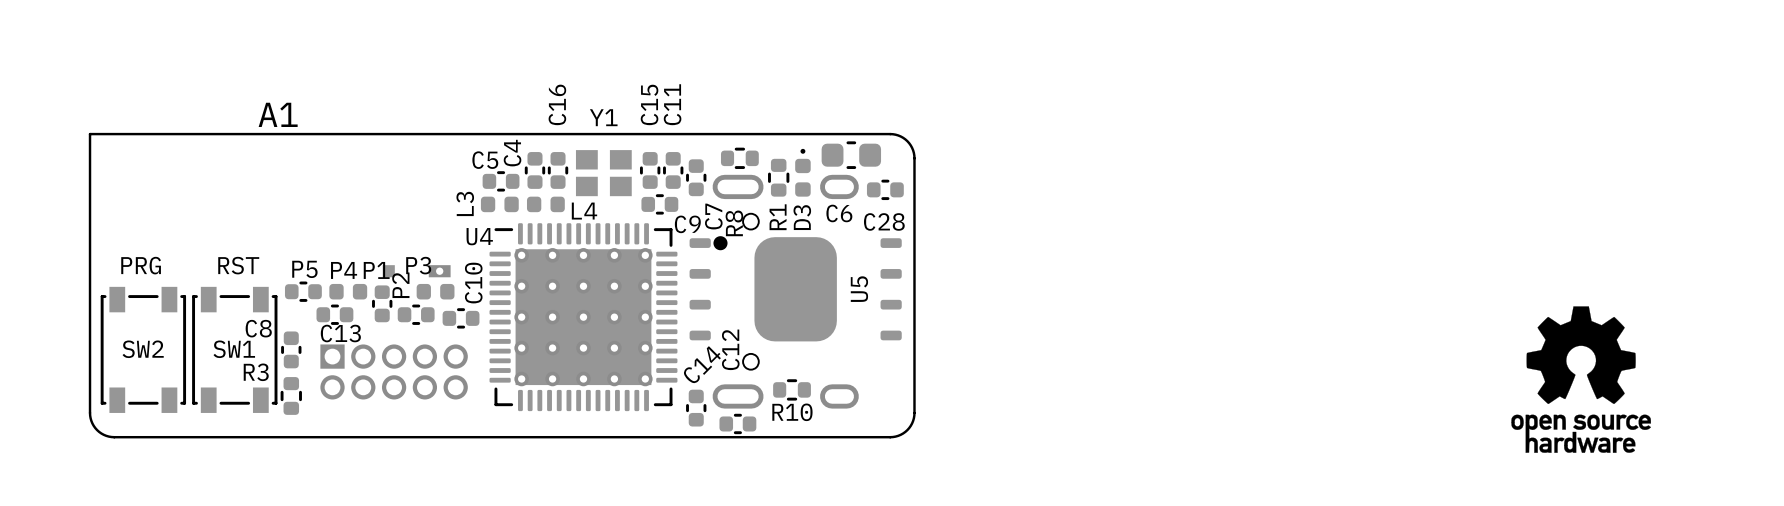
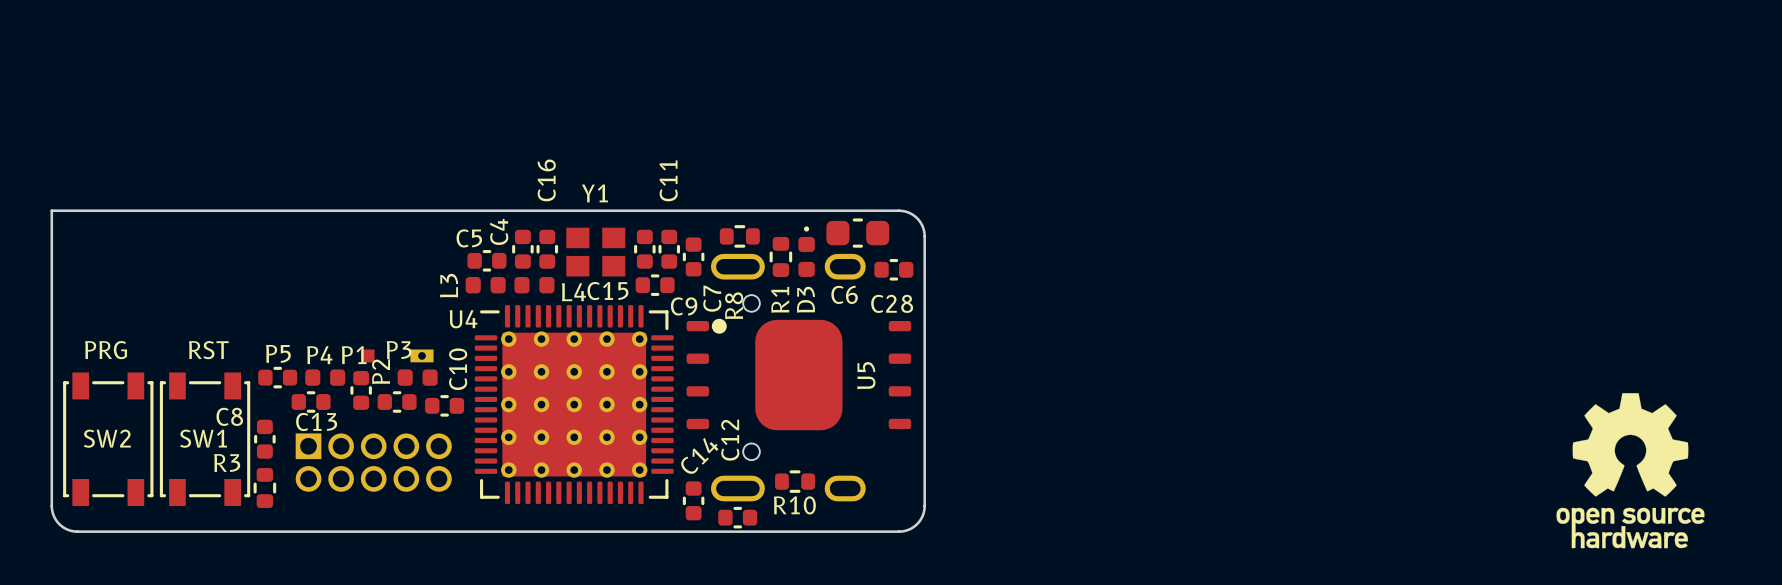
C15 name rotation: 0° (649, 104) -> 90° clockwise (607, 291)
C15 name position: C15 (649, 104) -> C15 (607, 291)
A1 name: A1 (278, 114) -> none

